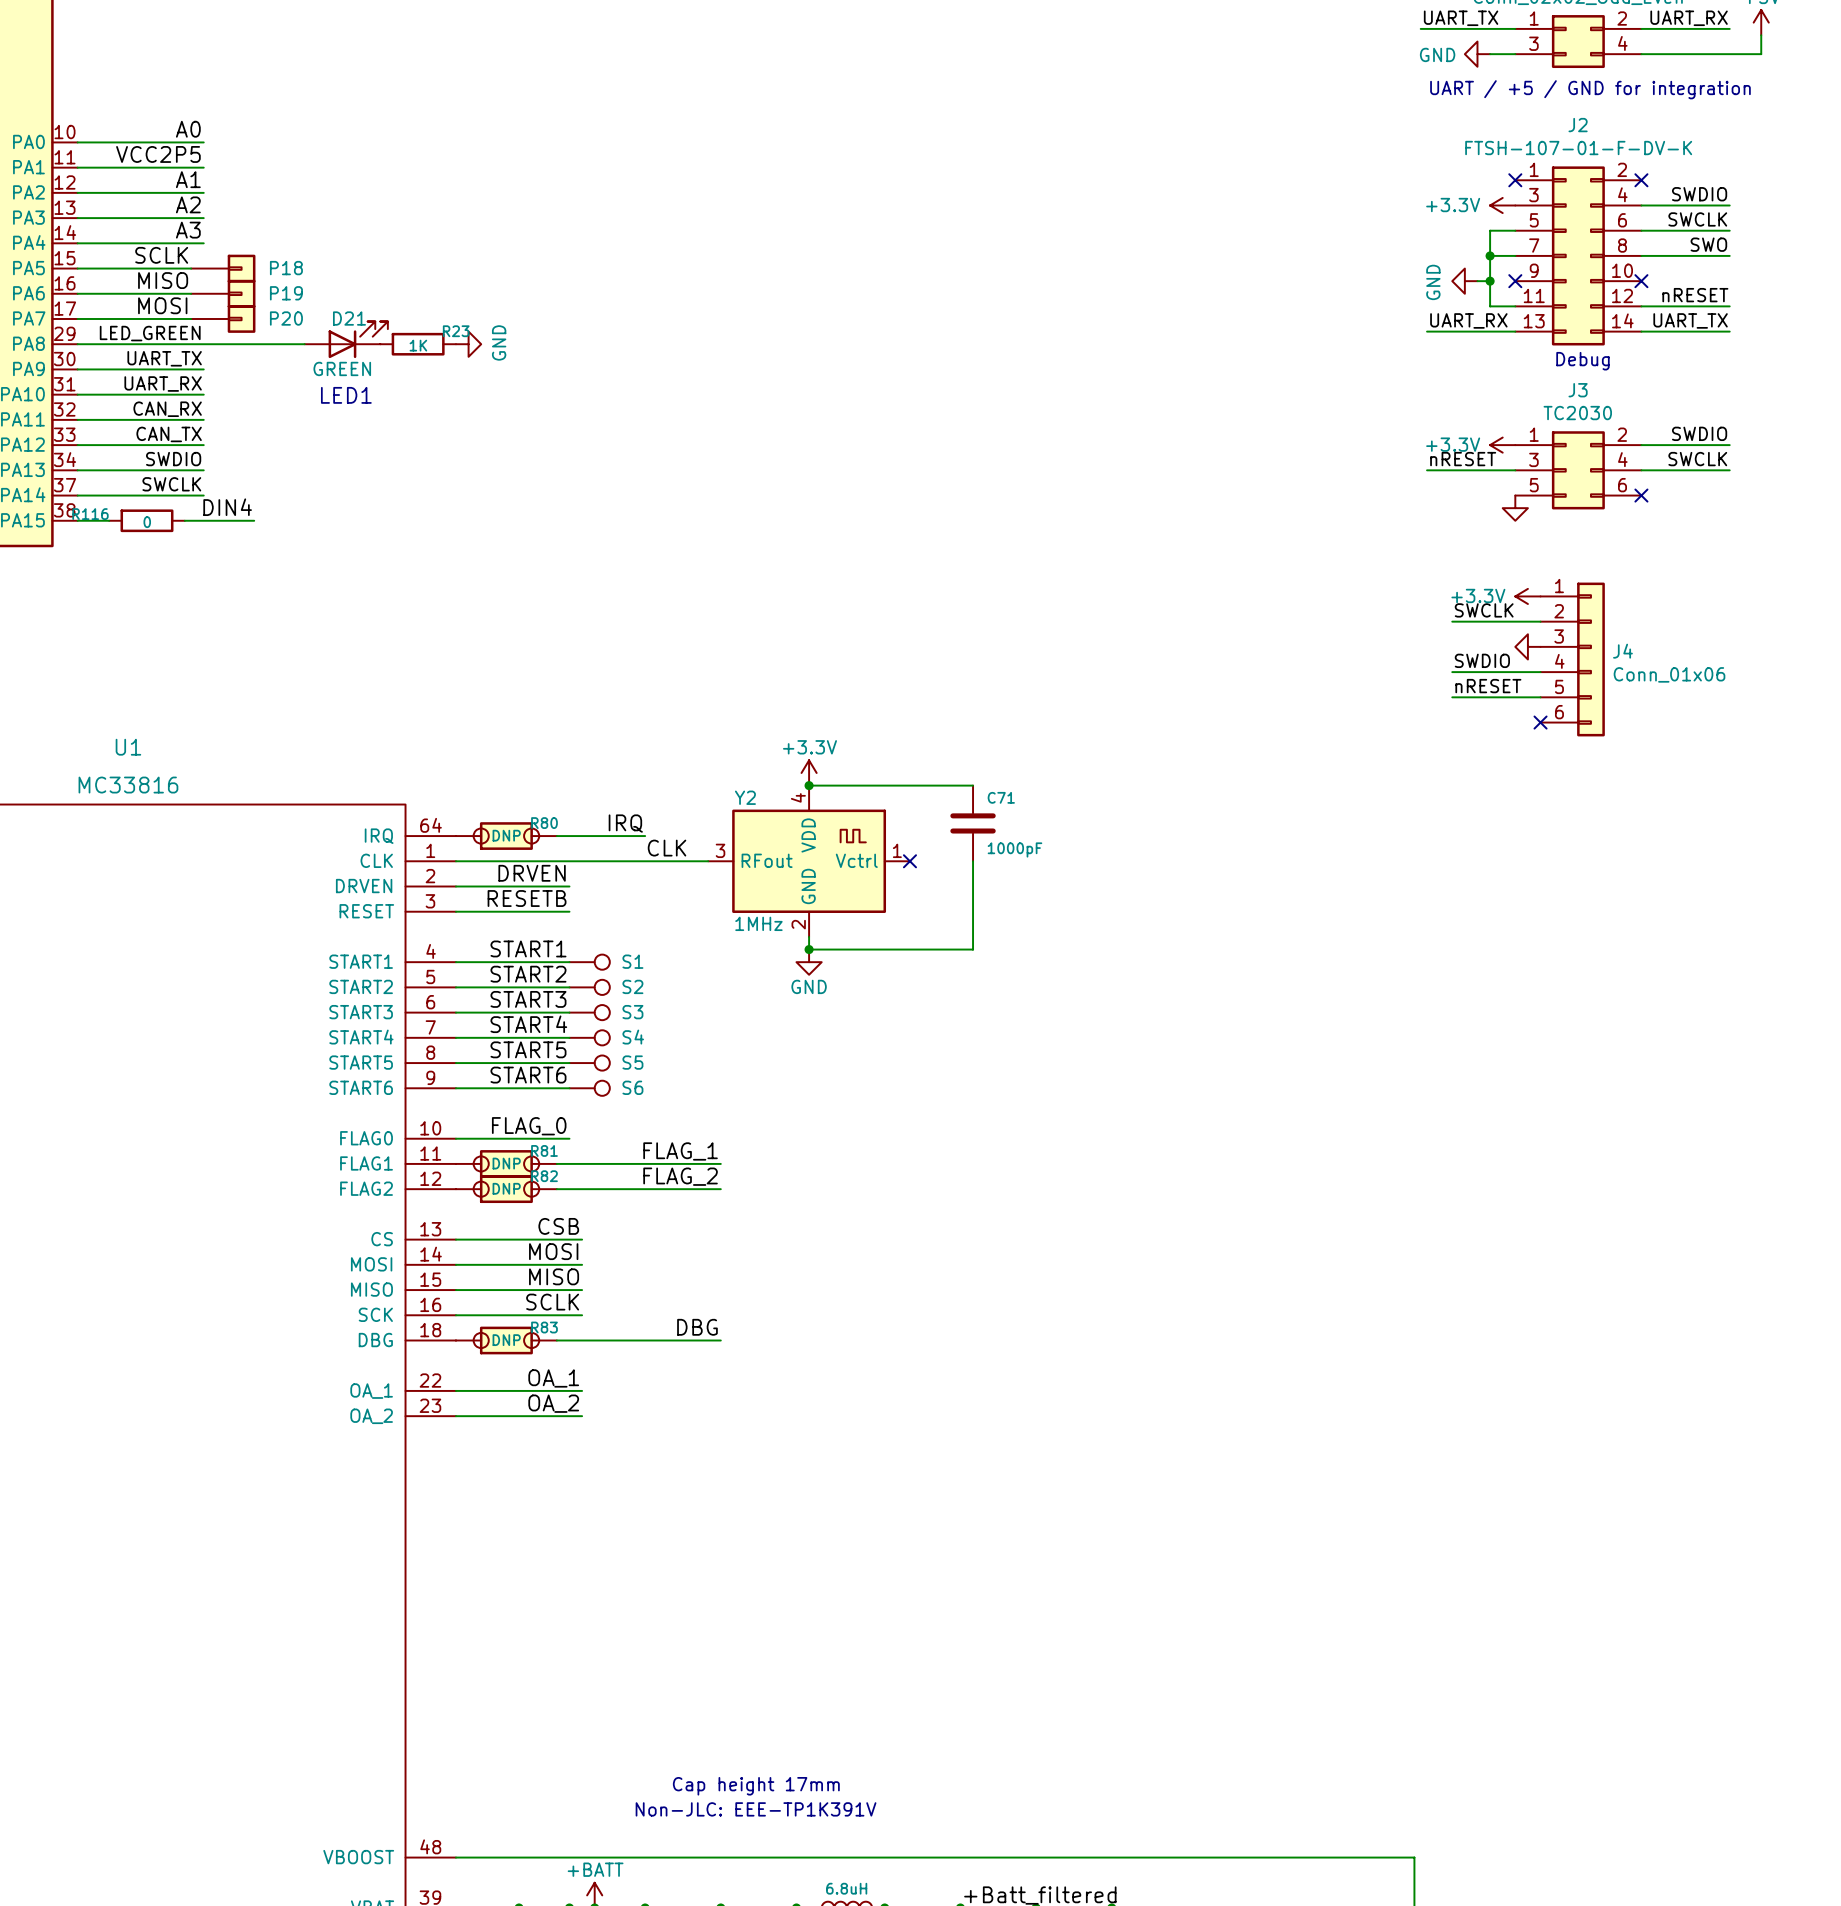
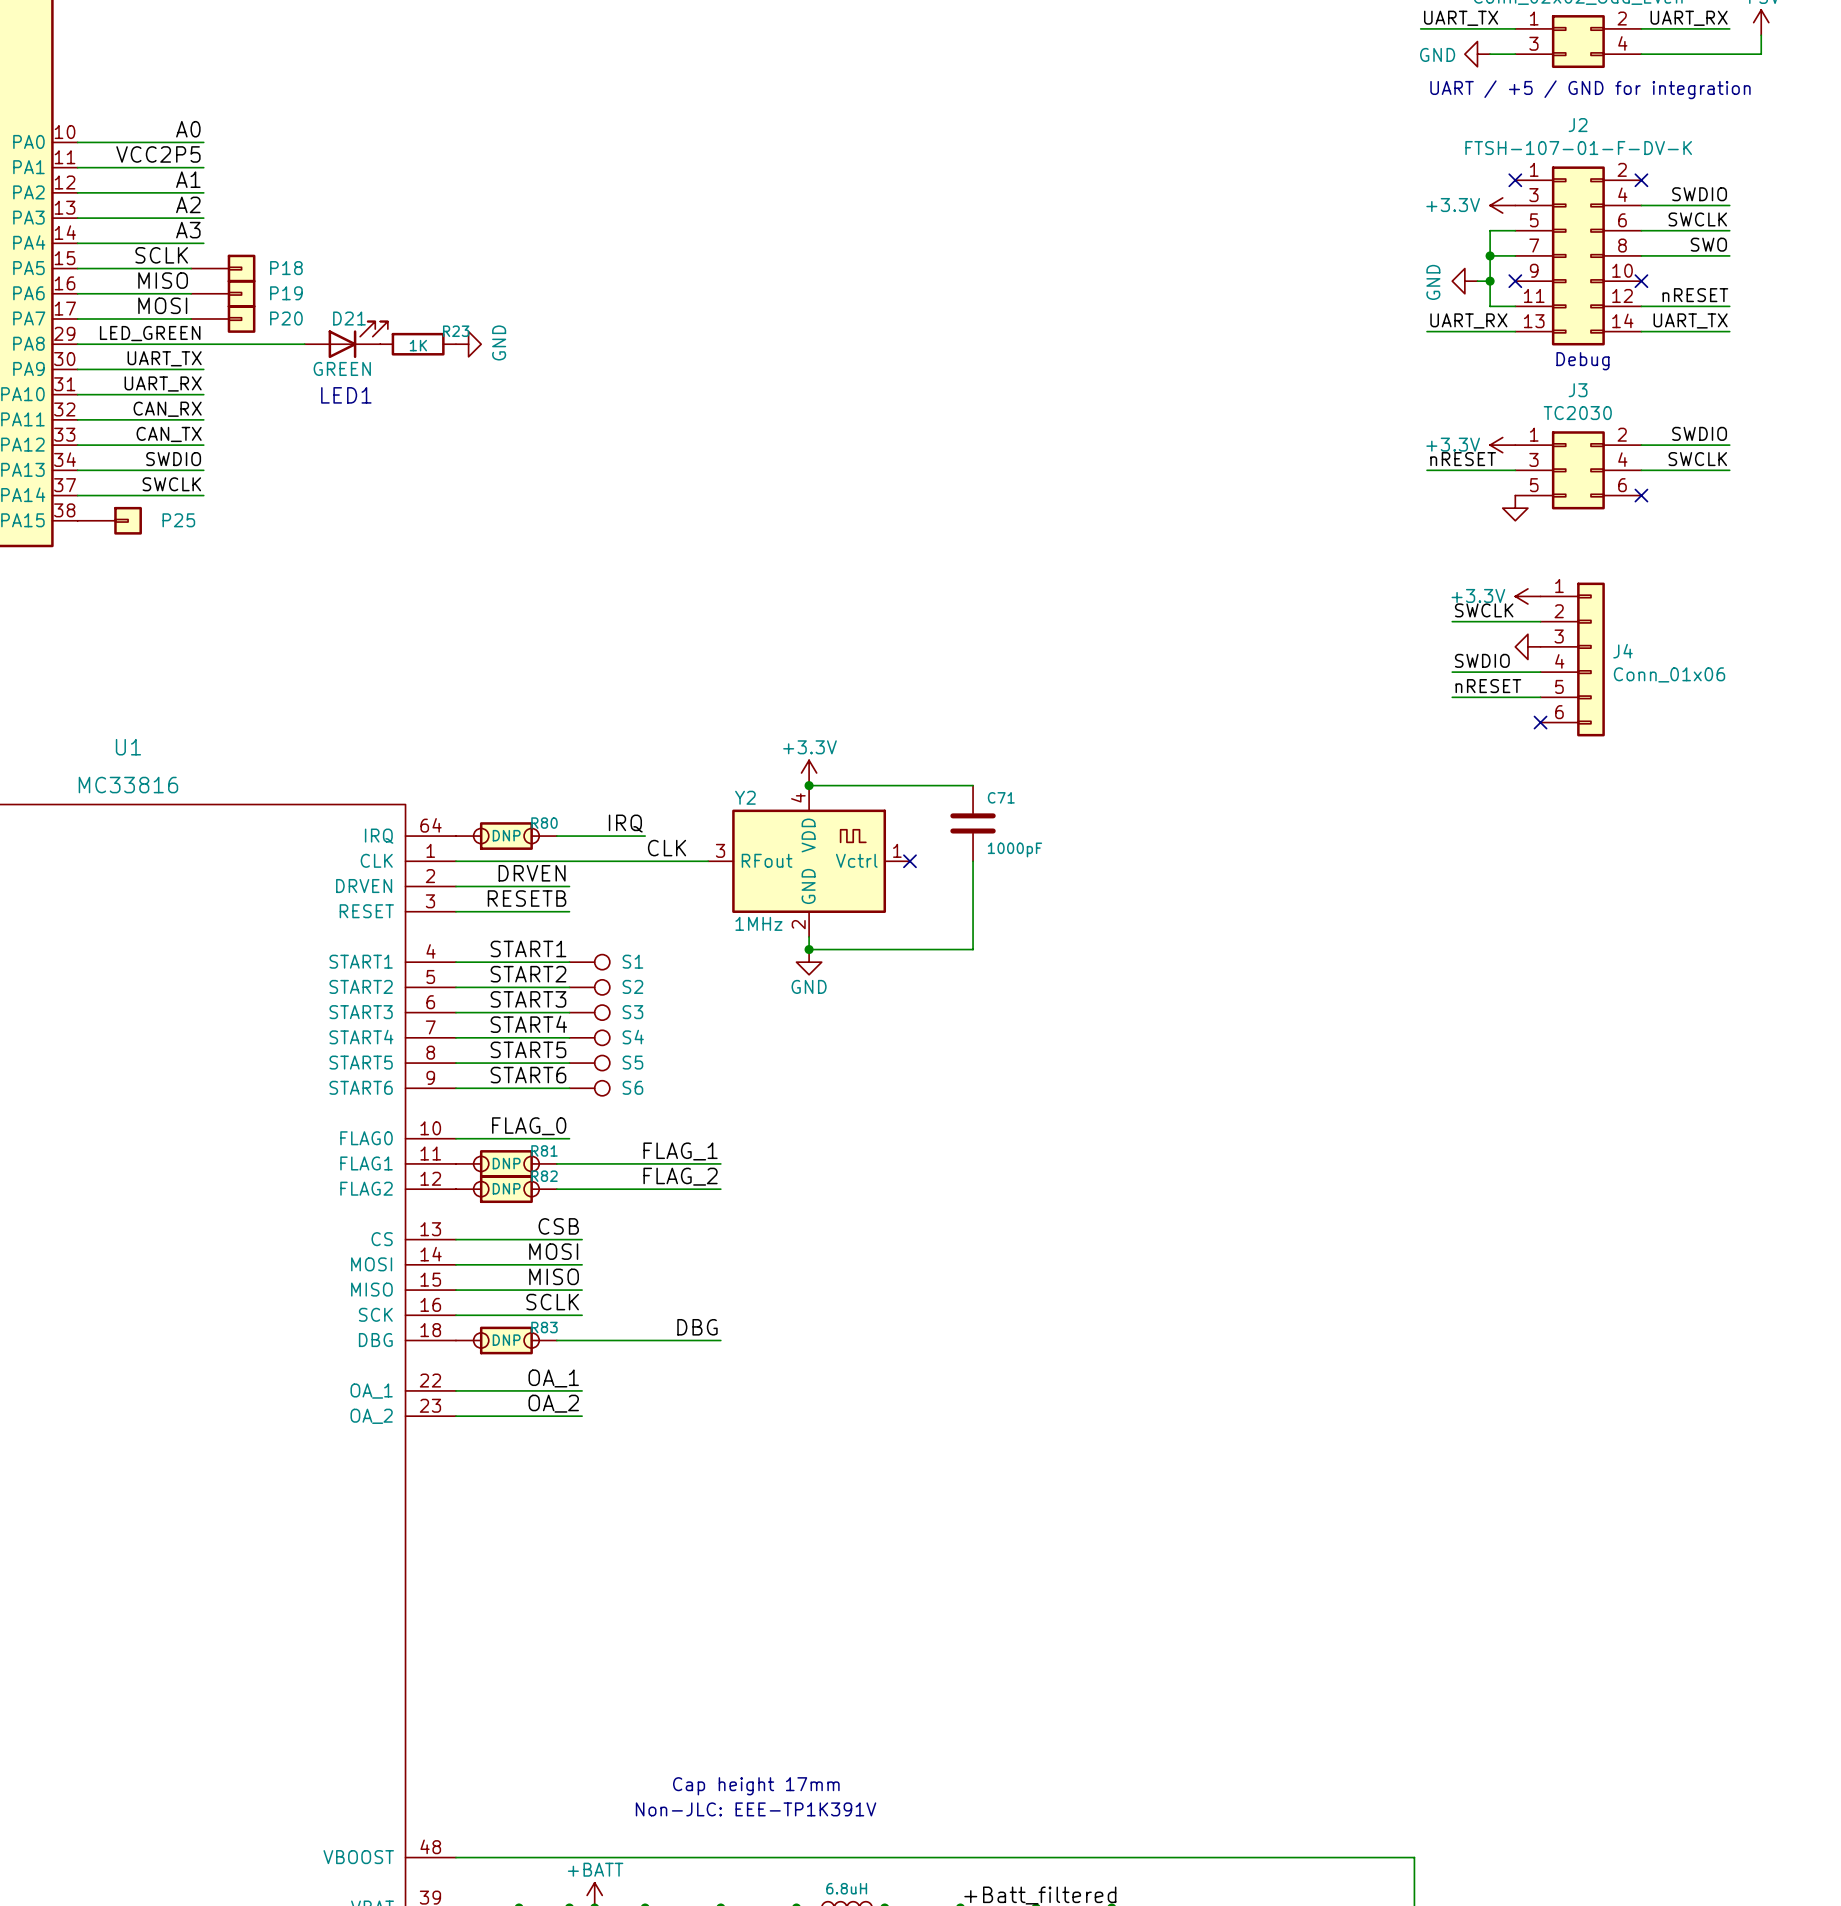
label: DIN4 (227, 507) -> none
P25: none -> (109, 520)
R116: 0 (147, 520) -> none
wire: (184, 520) (254, 520) -> none

